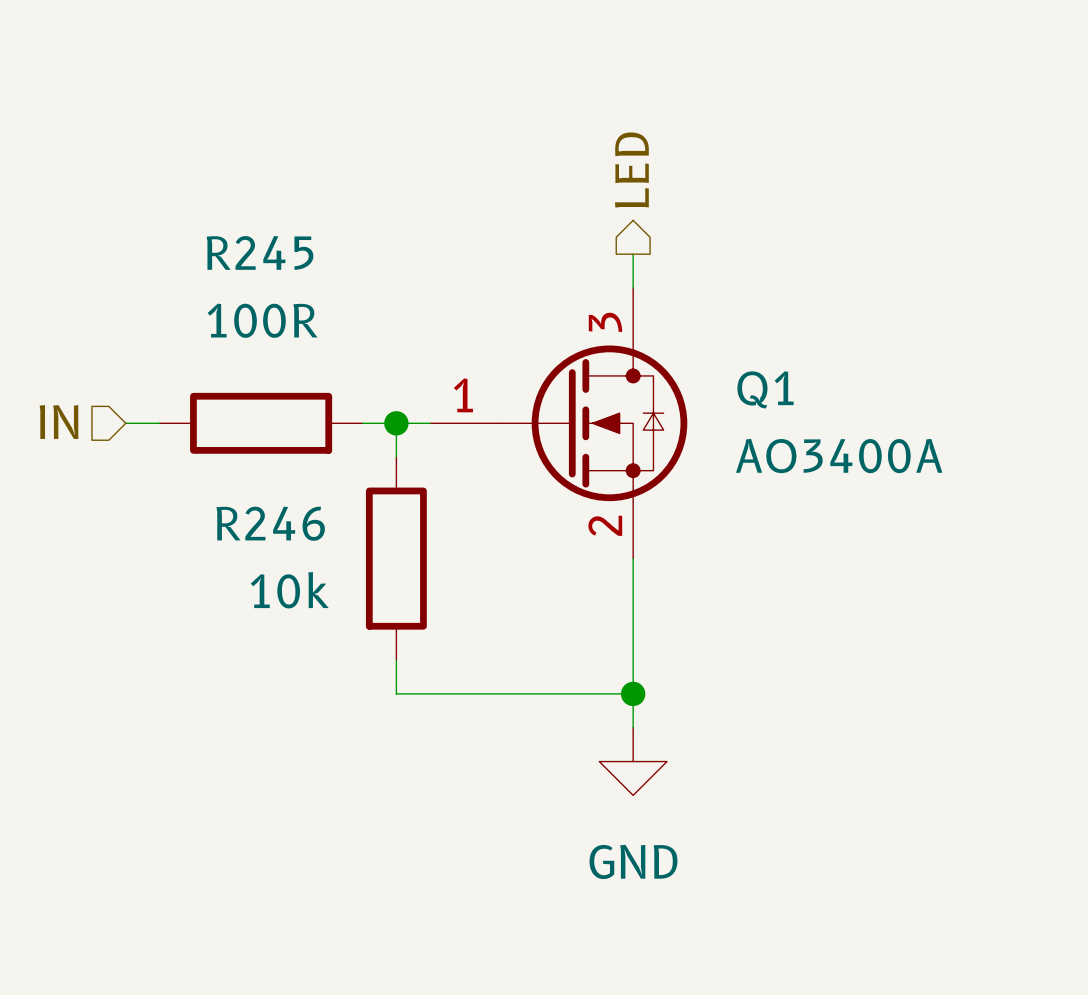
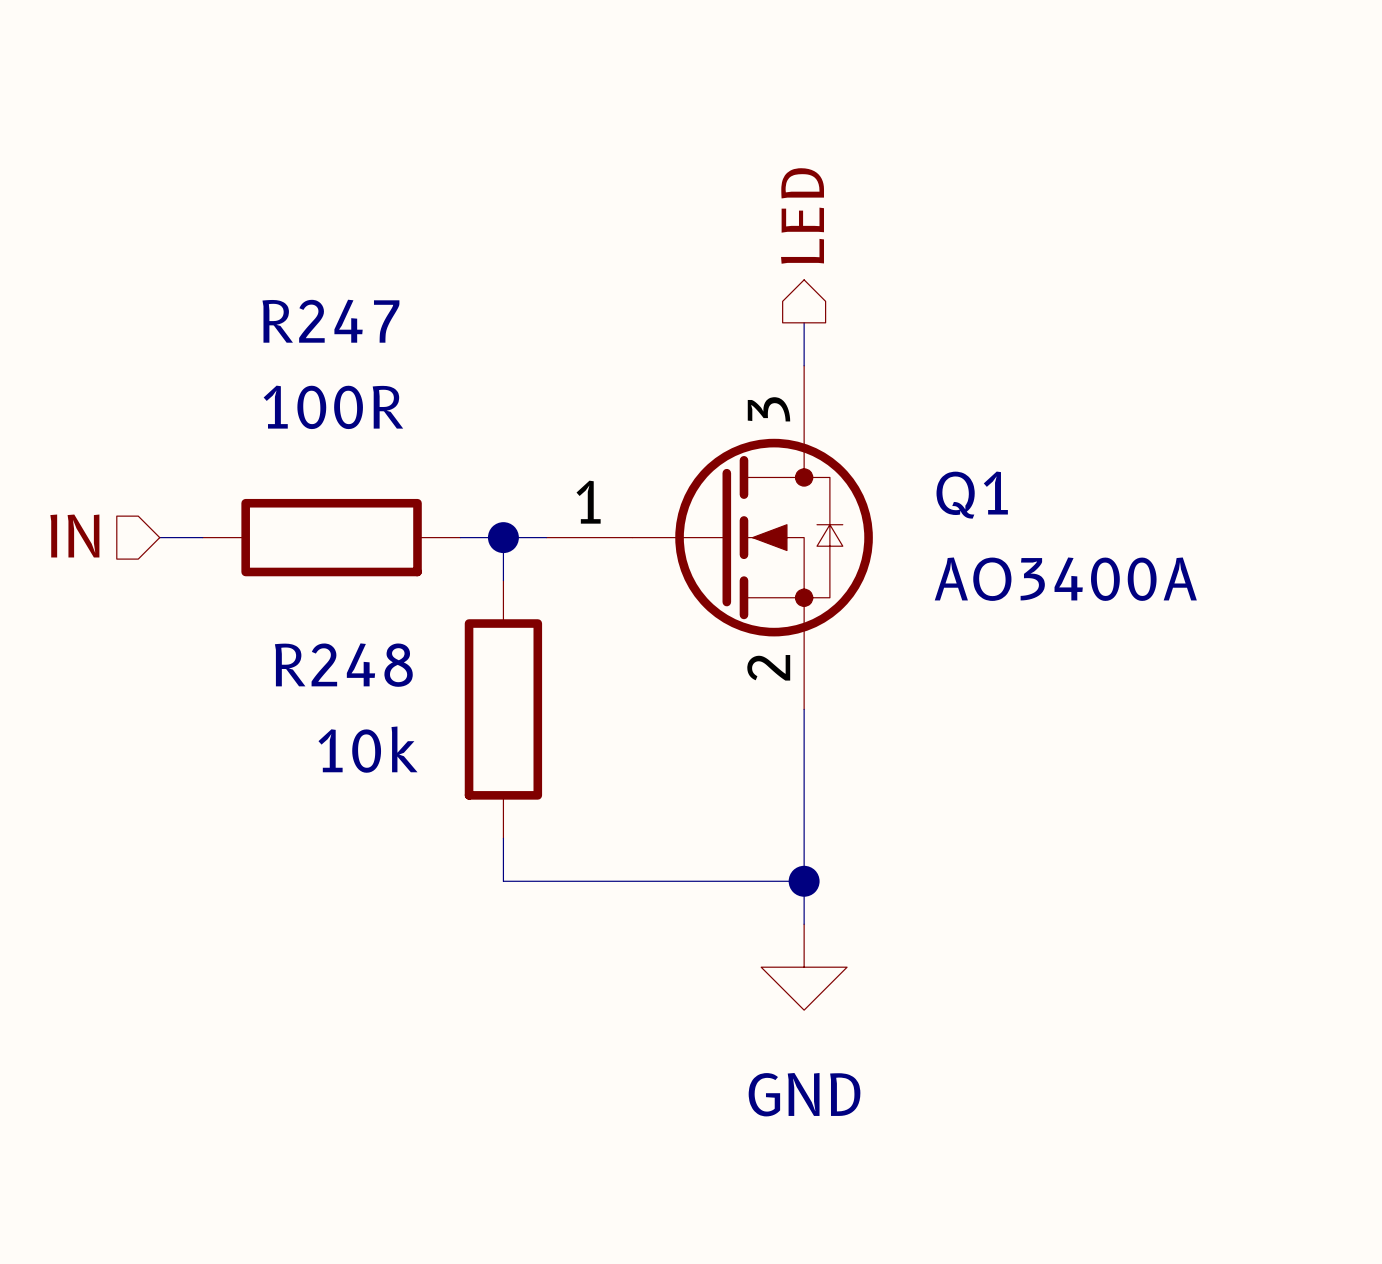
R245 name: R245 (260, 252) -> R247 (330, 321)
R246 name: R246 (270, 523) -> R248 (343, 665)

